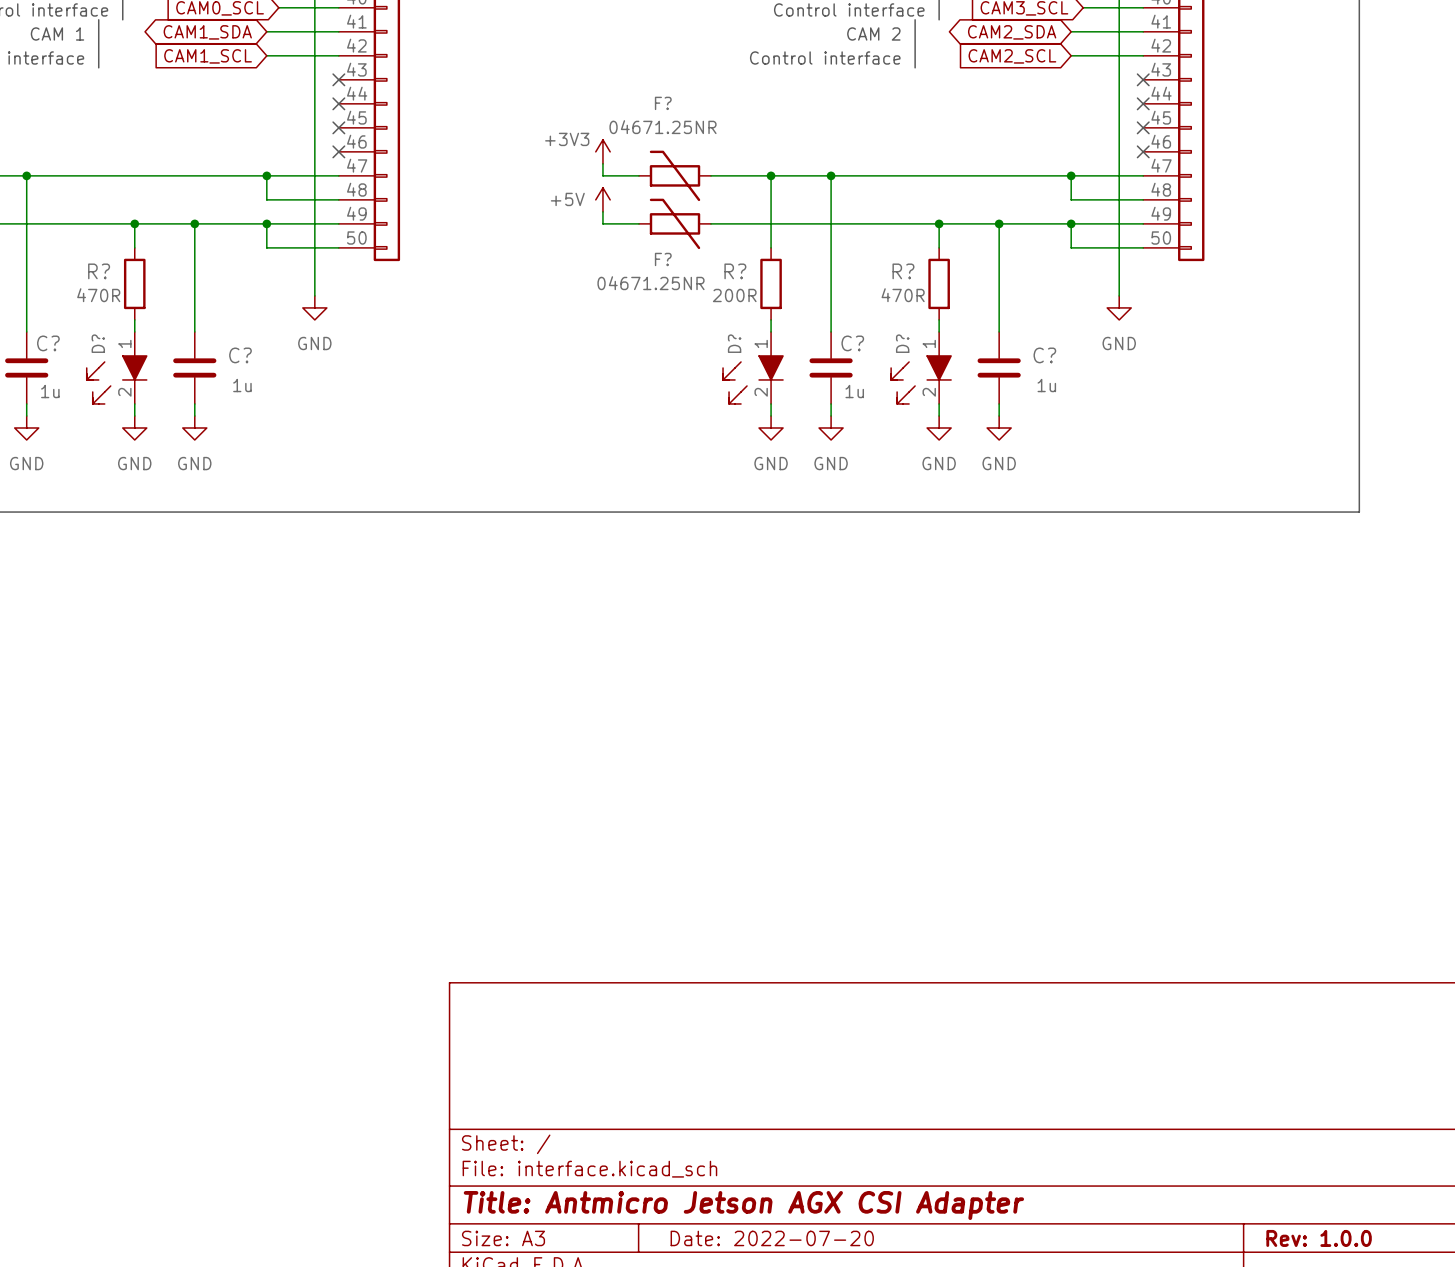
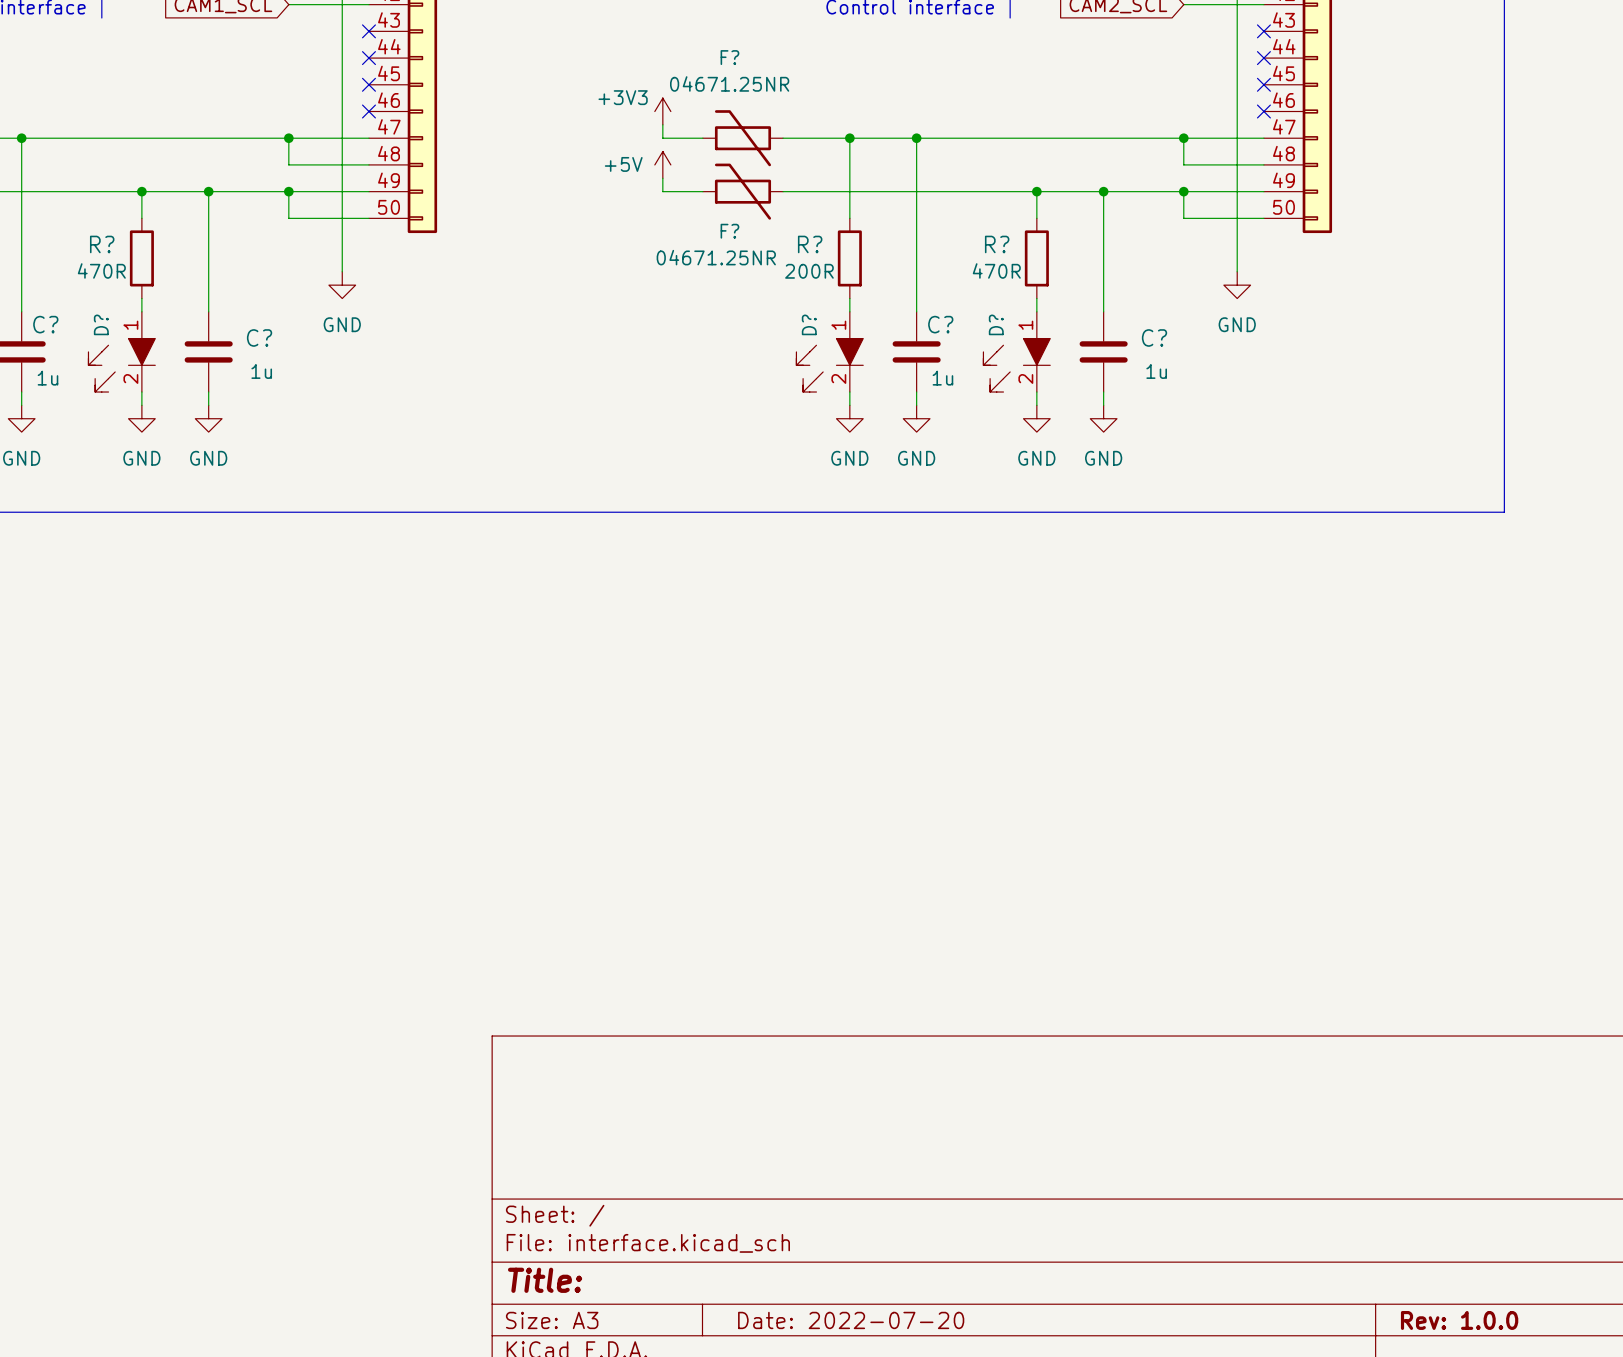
title block: Title: Antmicro Jetson AGX CSI Adapter (743, 1205) -> Title: (545, 1280)

